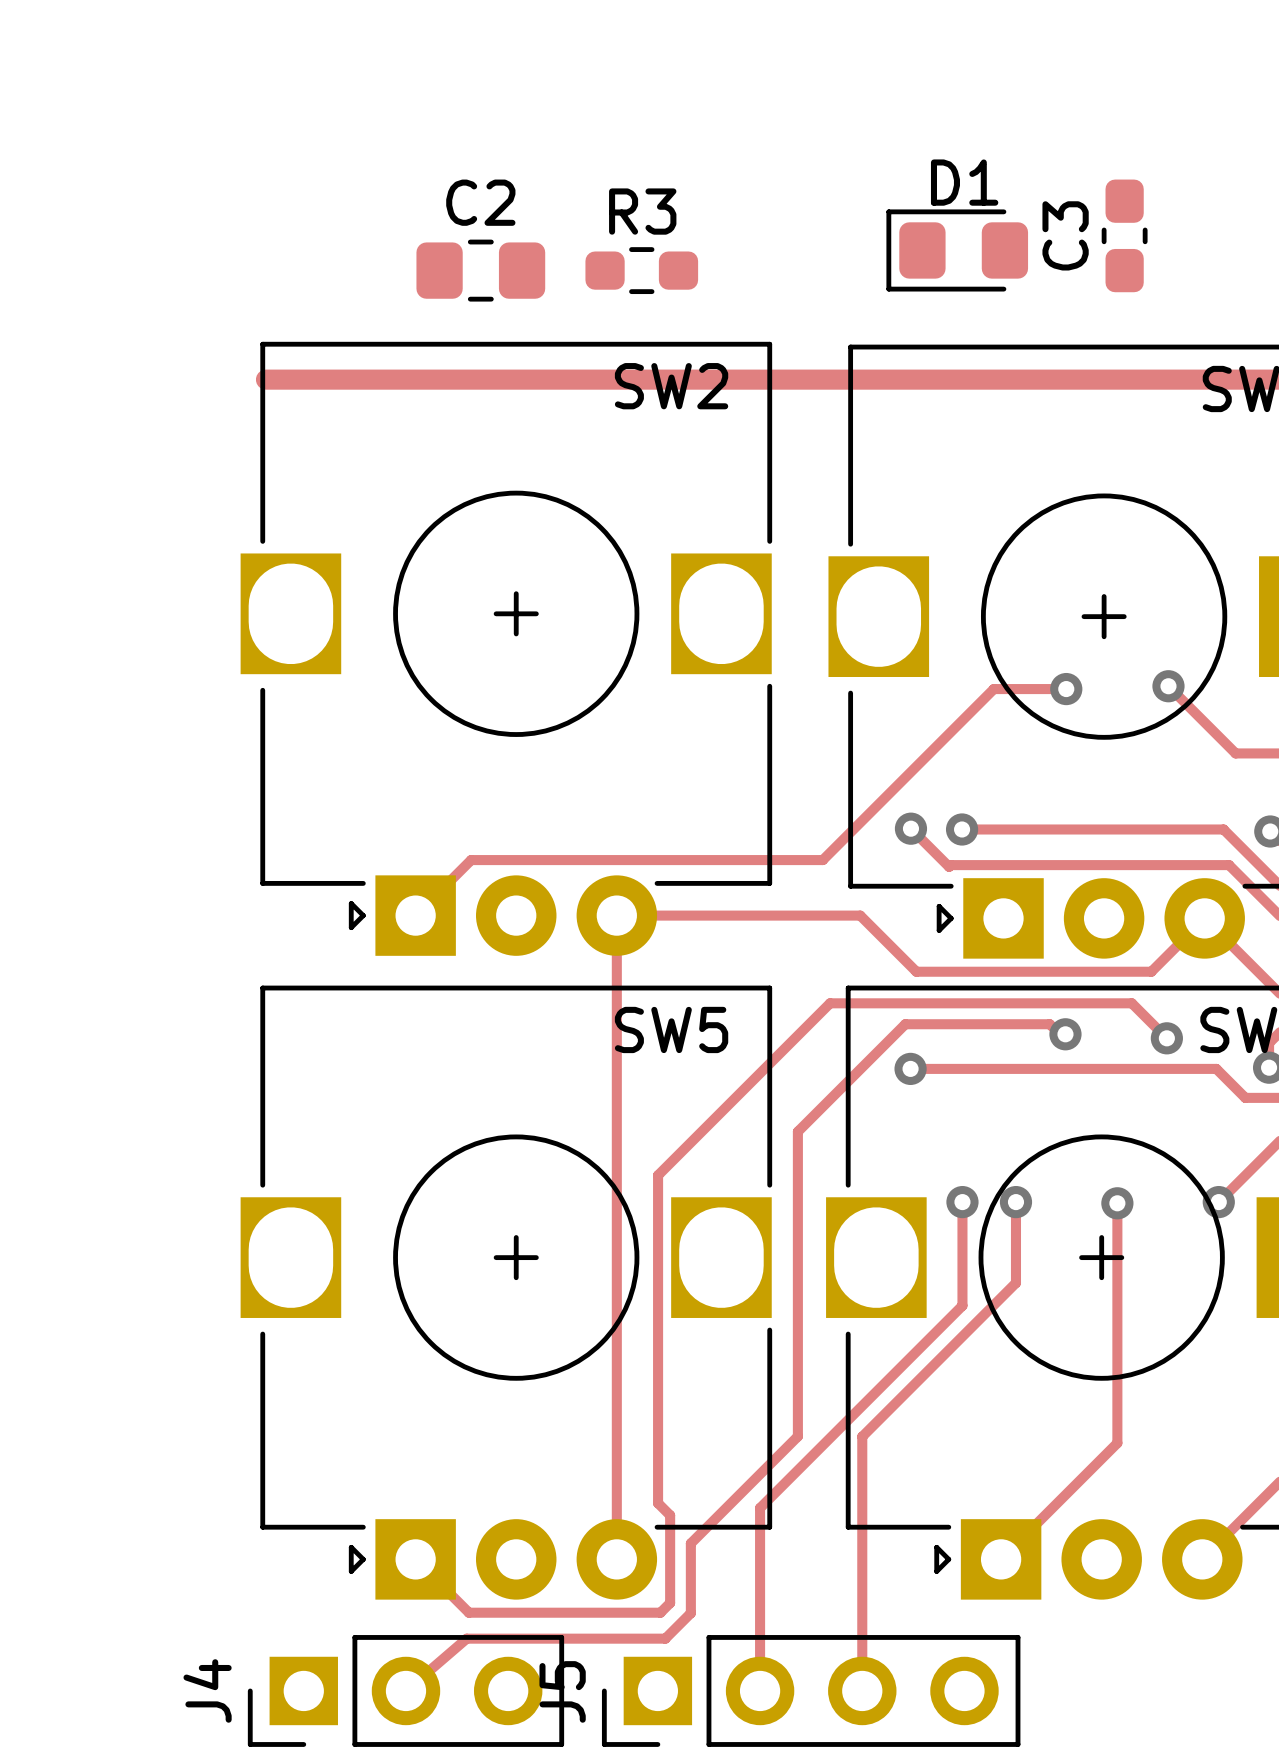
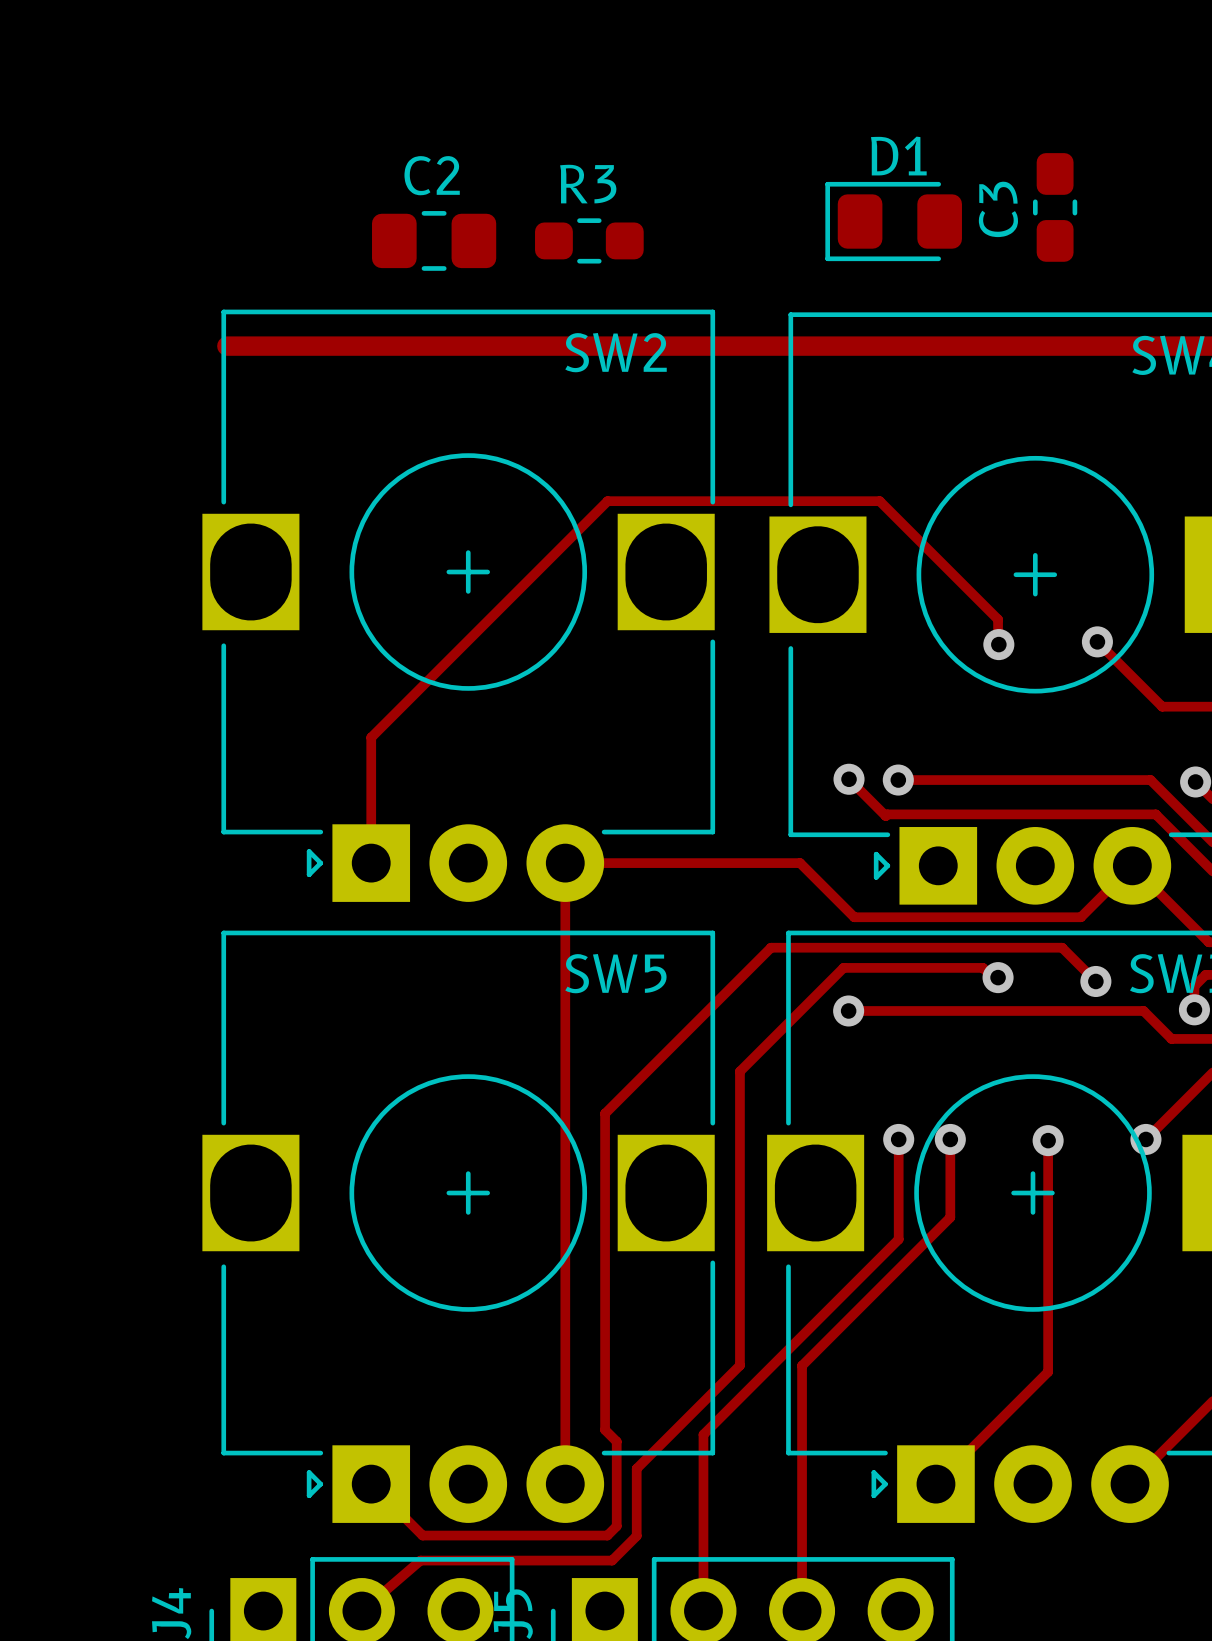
track: (1066, 689) (993, 689) (822, 860) (471, 860) (415, 915) -> (998, 641) (998, 619) (879, 501) (607, 501) (371, 737) (371, 863)

